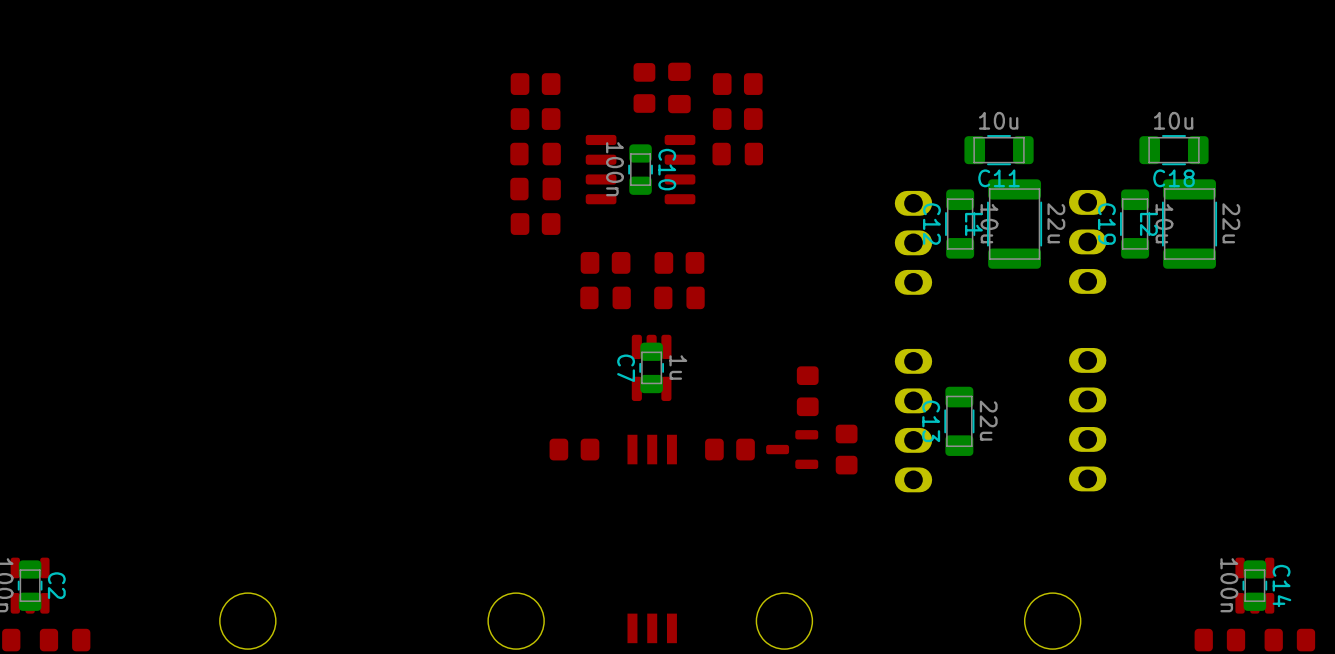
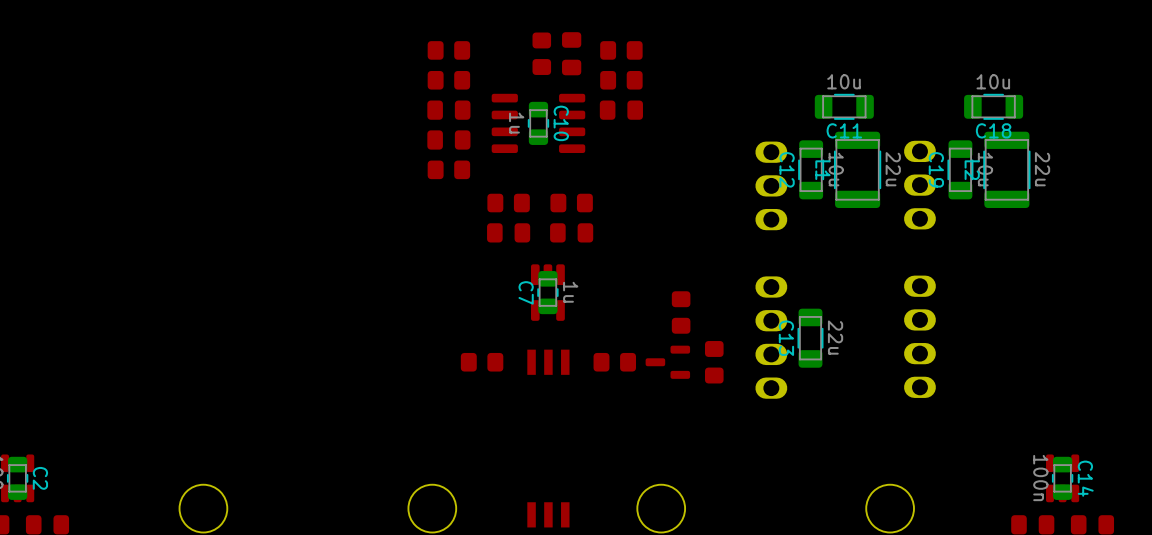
C10 value: 100n (615, 169) -> 1u (516, 123)

